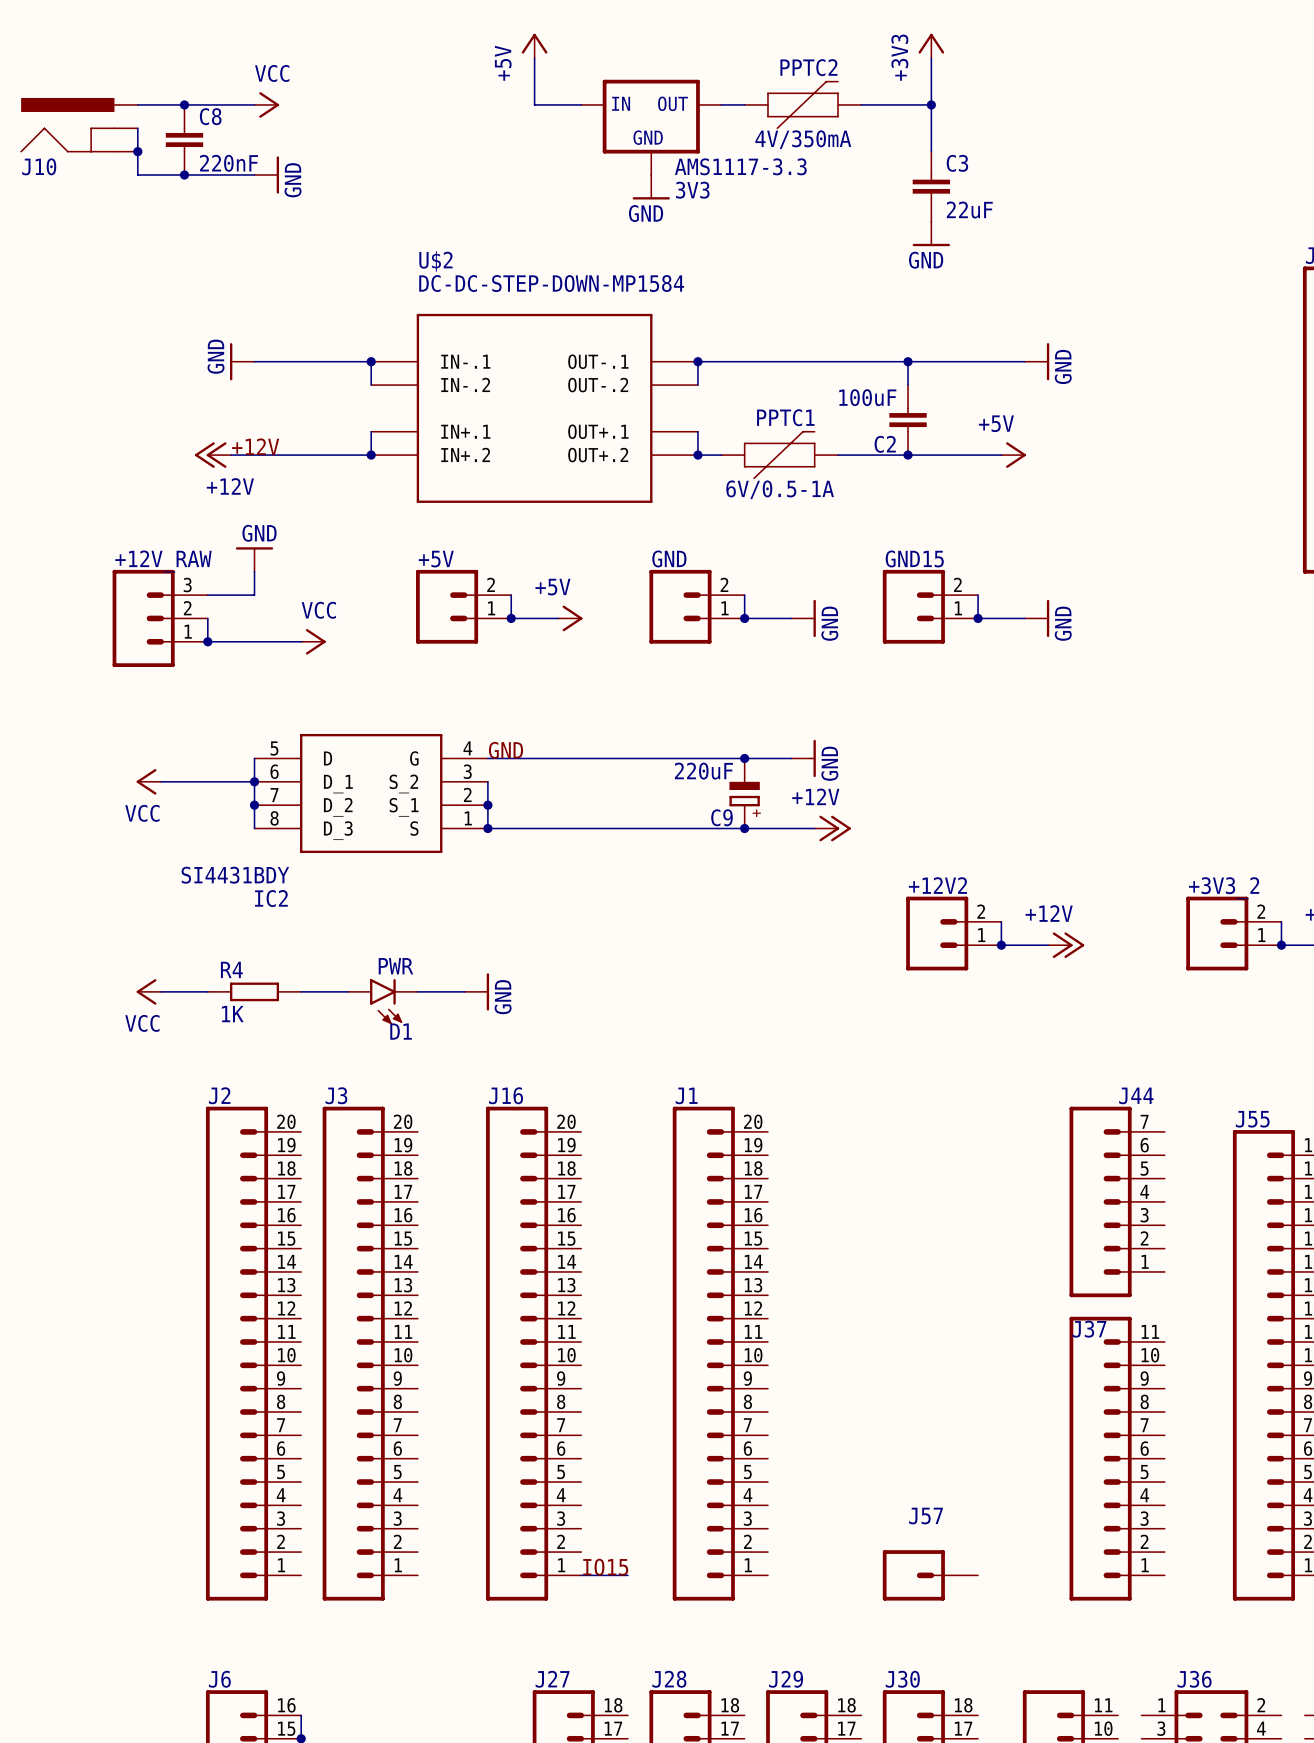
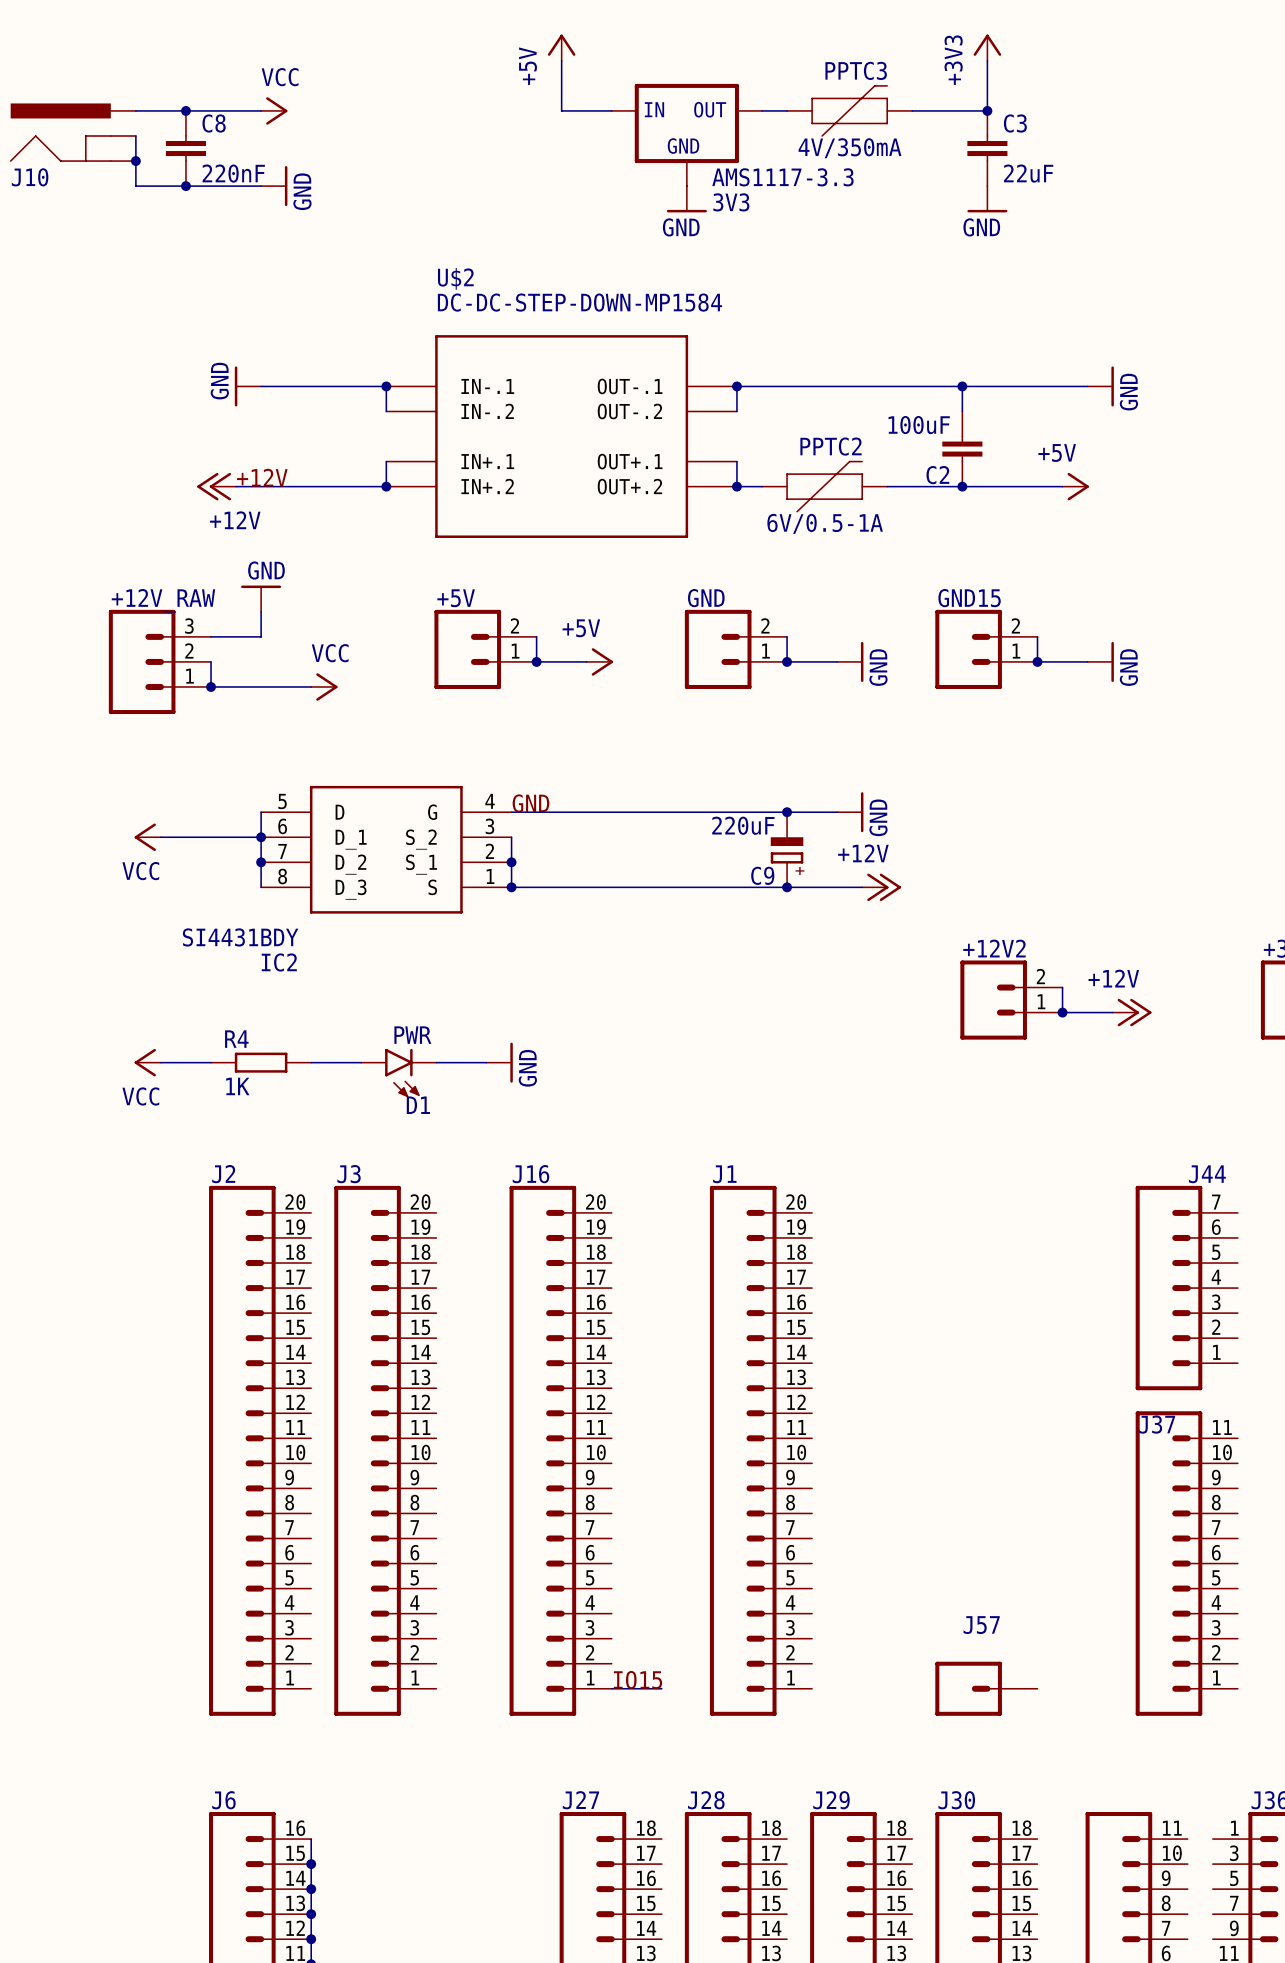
PPTC2 name: PPTC2 (808, 67) -> PPTC3 (856, 70)
C3 position: (931, 186) -> (987, 148)
power symbol position: GND (931, 233) -> GND (987, 199)
PPTC1 name: PPTC1 (785, 417) -> PPTC2 (831, 446)

